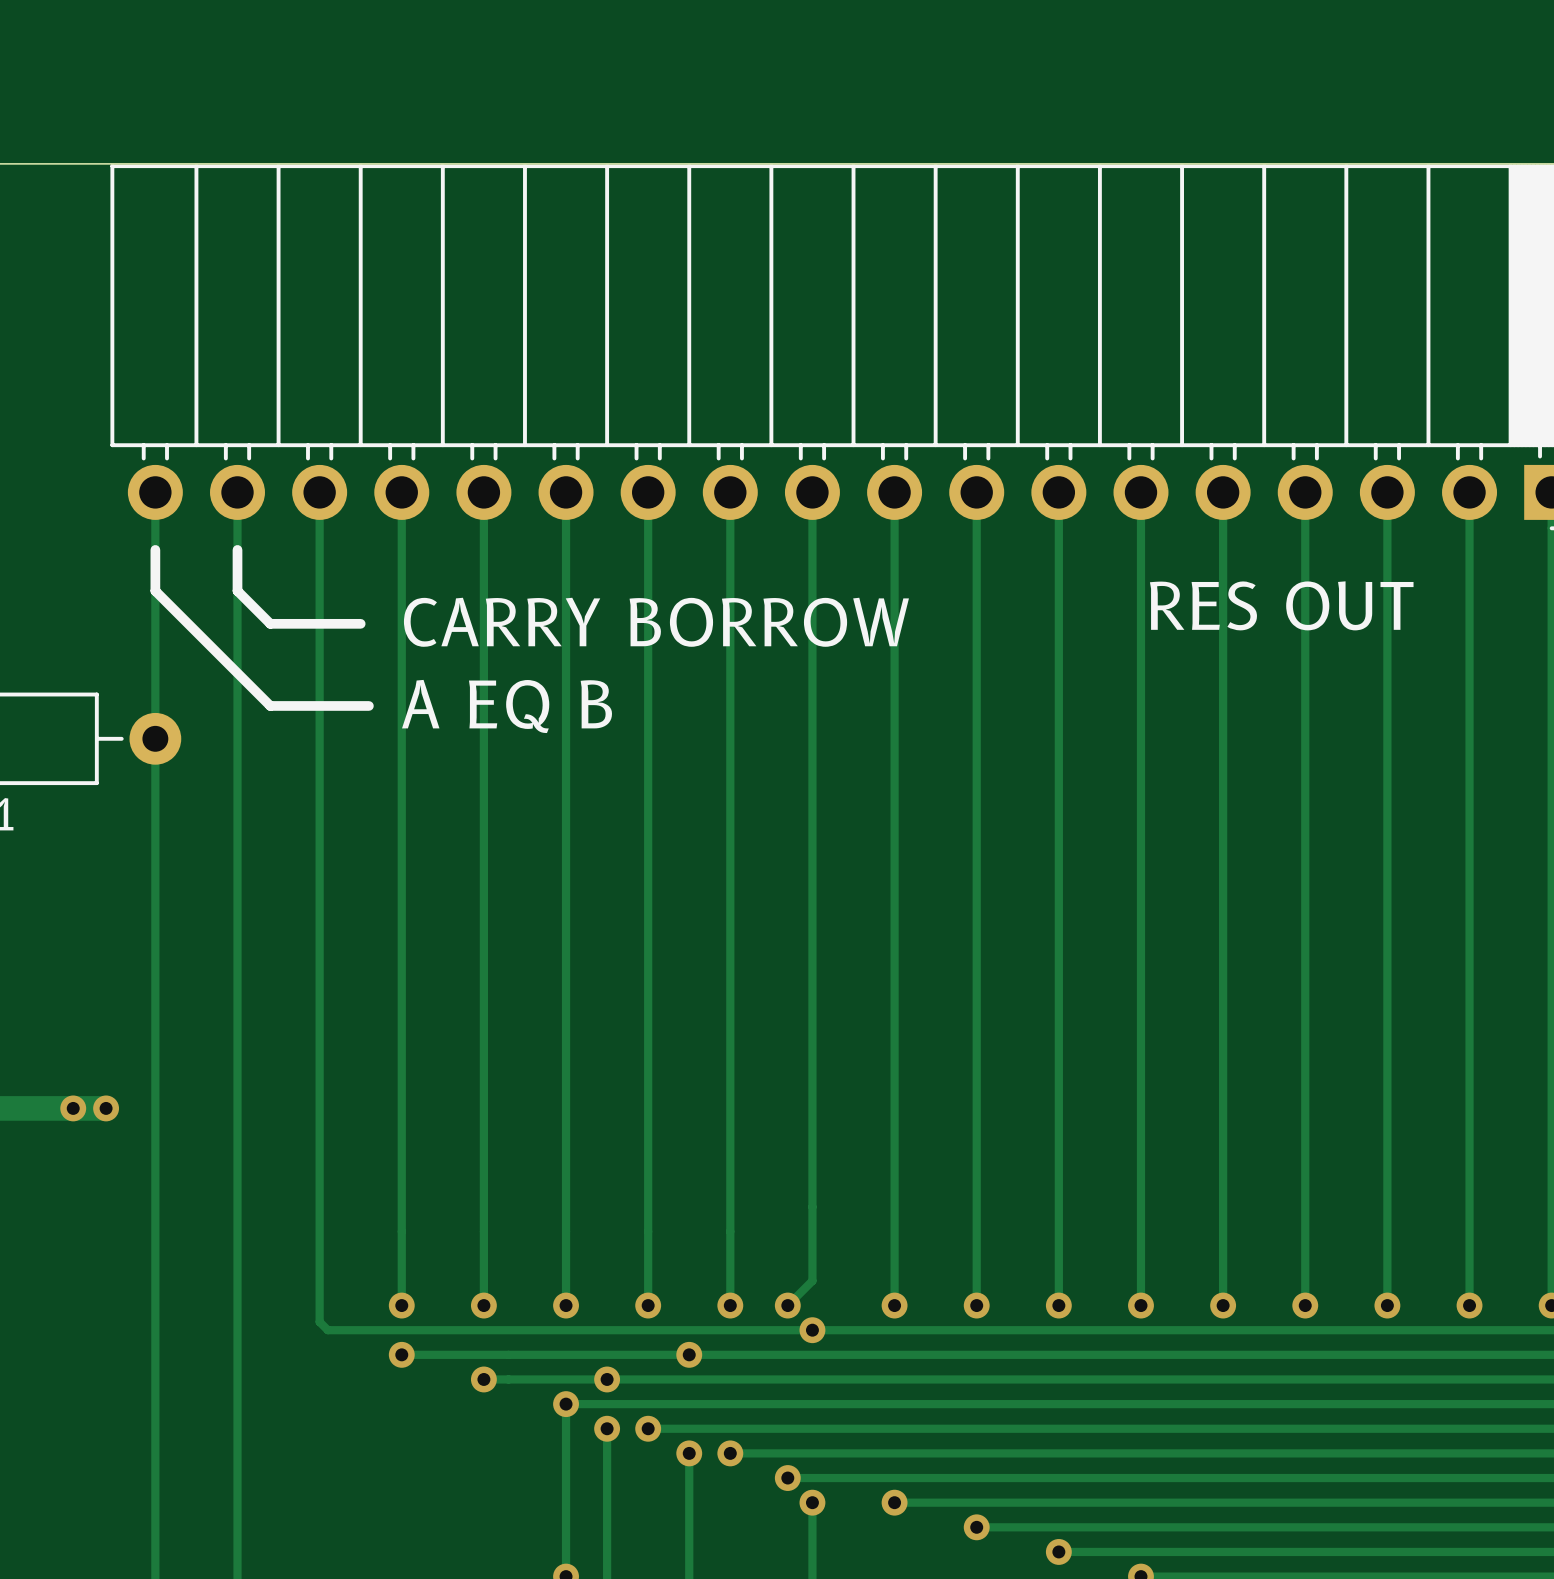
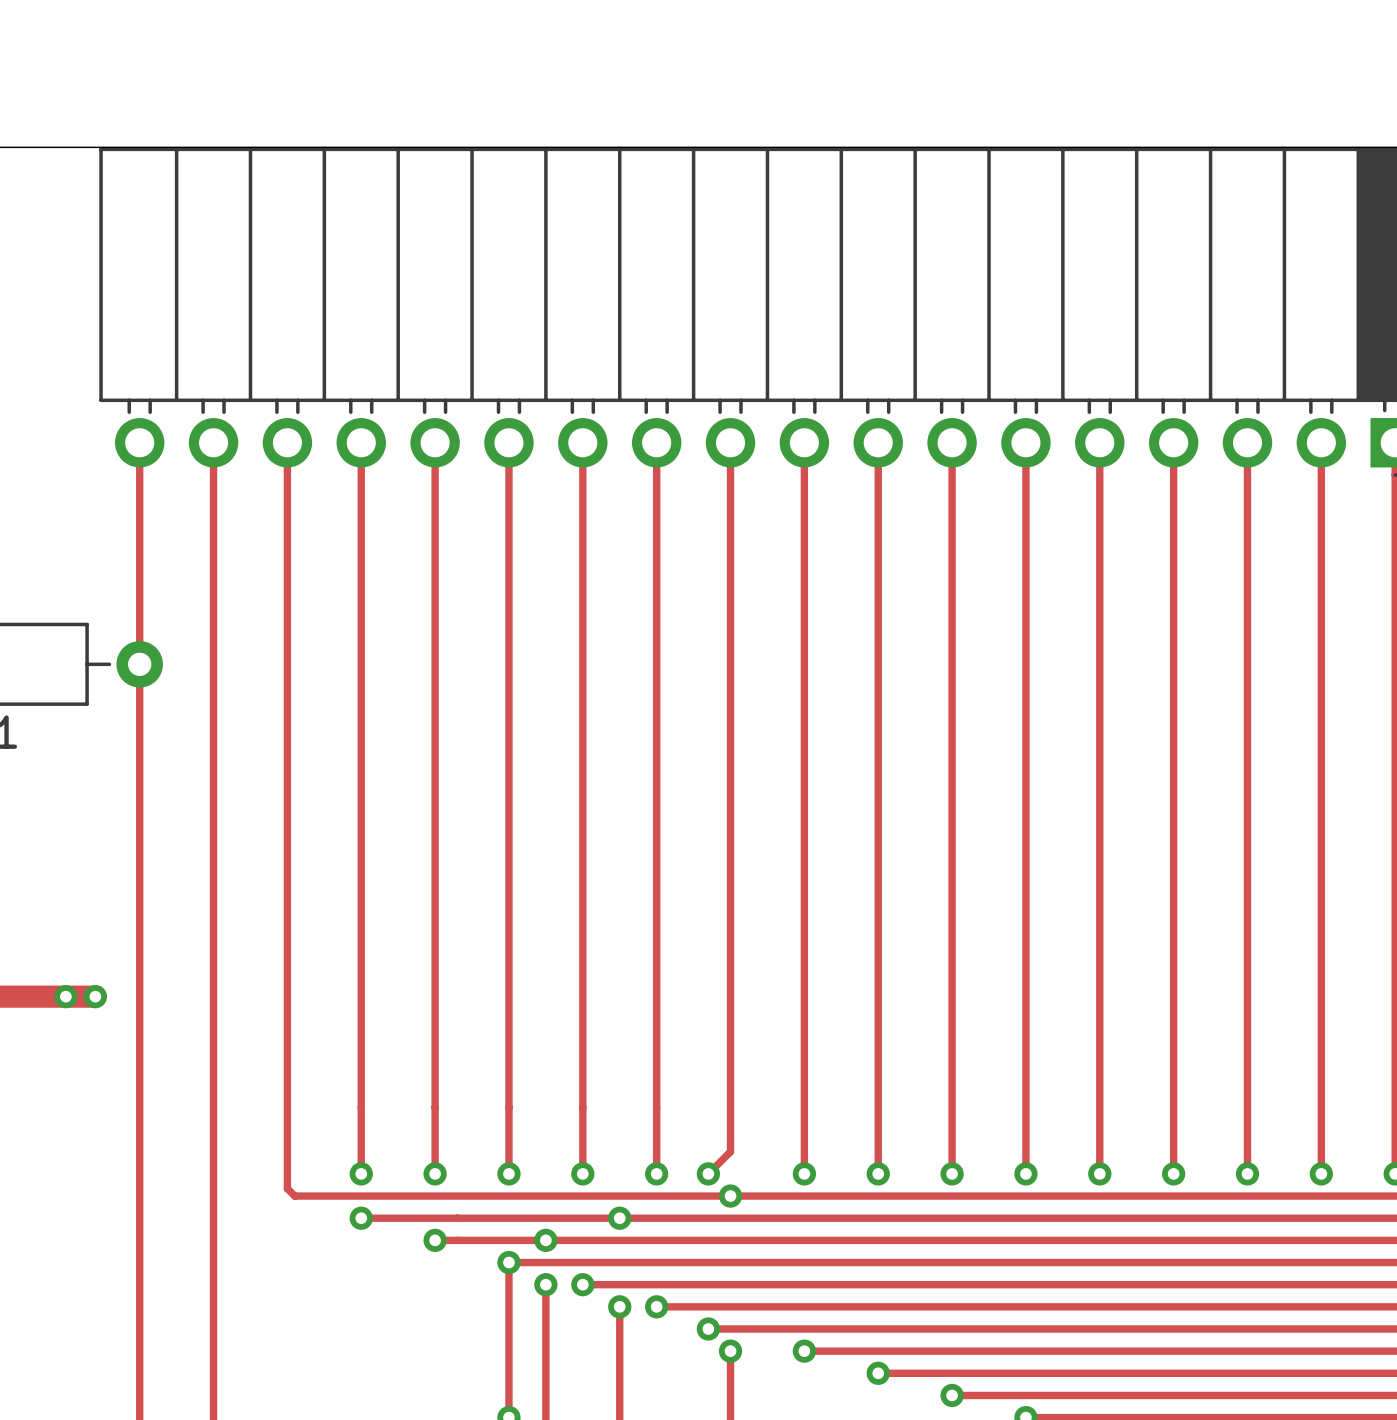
line: (155, 549) (155, 590) (270, 705) (368, 705) -> none
line: (237, 549) (237, 590) (270, 623) (360, 623) -> none
text: RES OUT (1281, 605) -> none
text: CARRY BORROW (656, 622) -> none
text: A EQ B (507, 706) -> none

